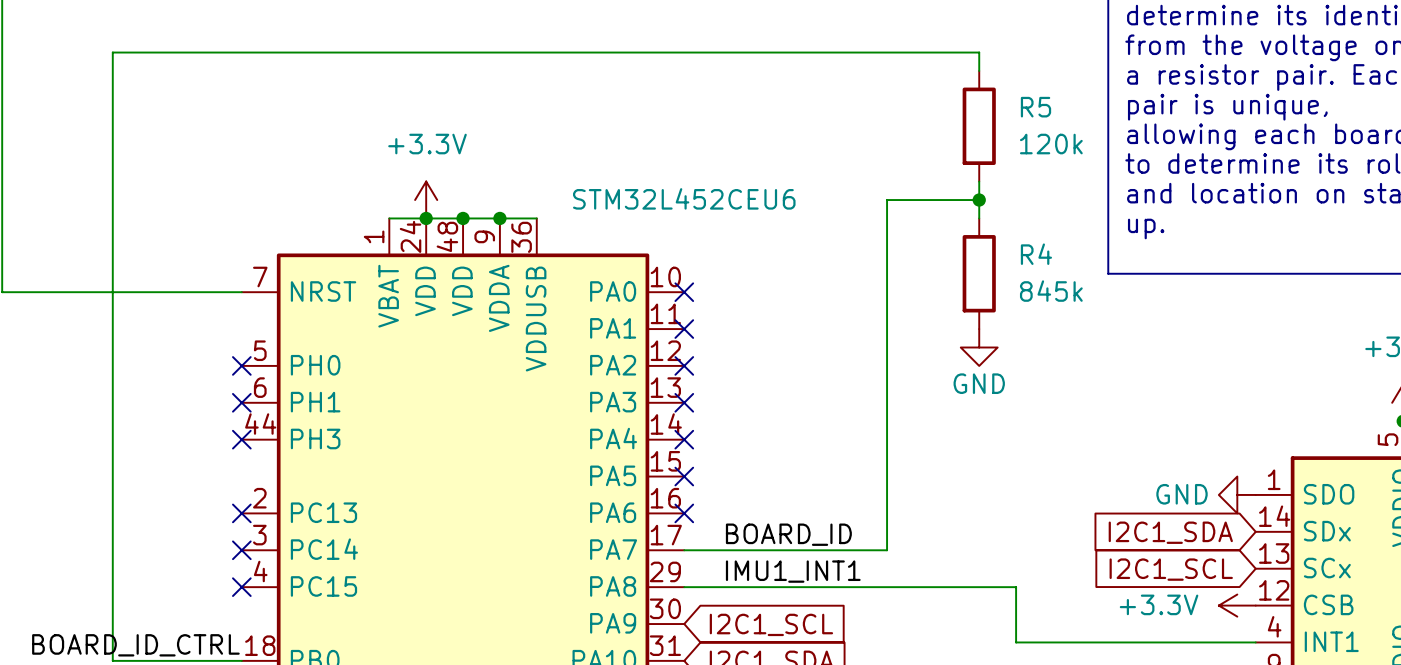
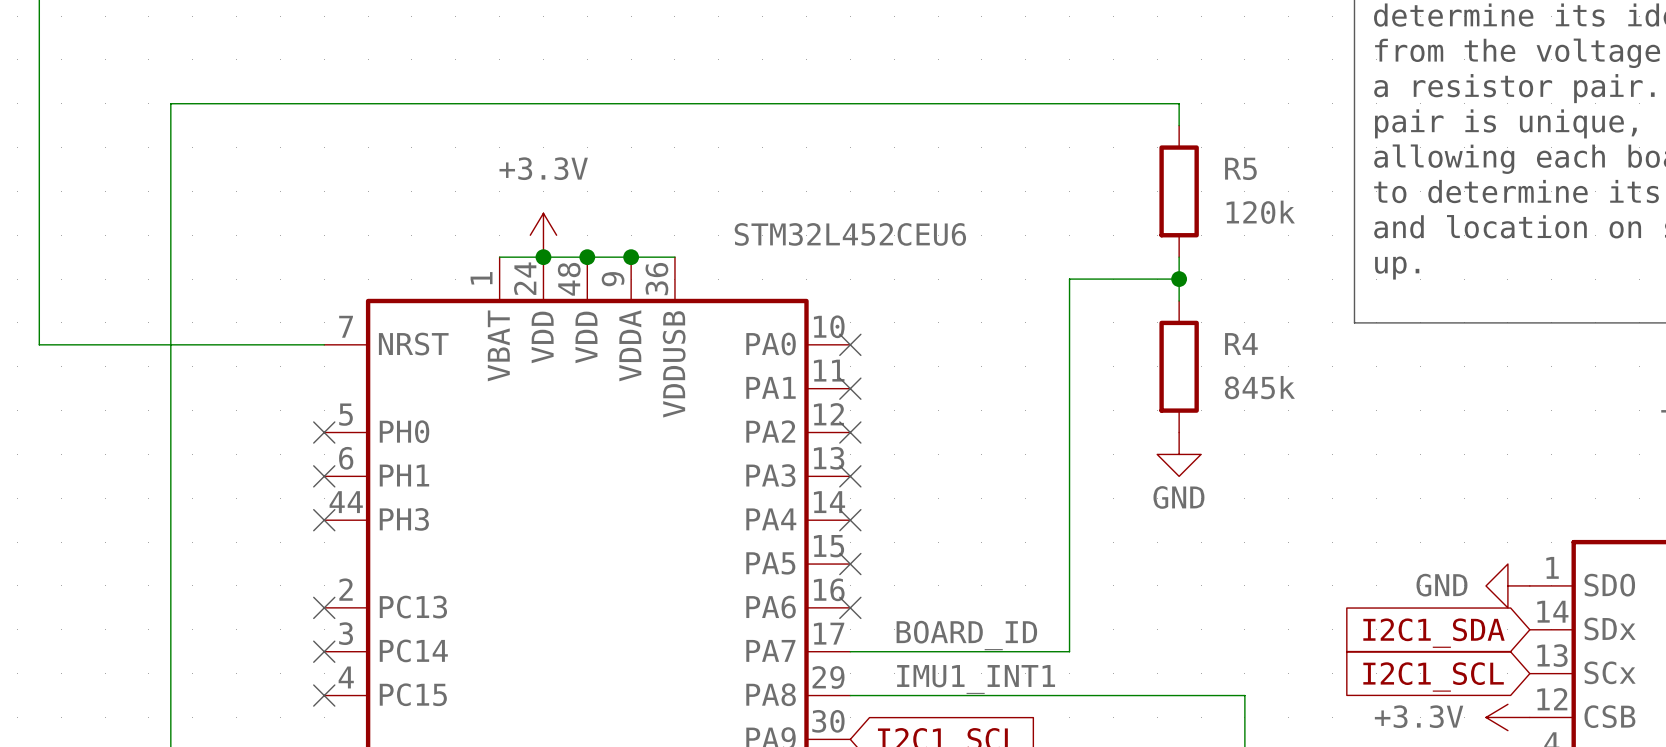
wire: (979, 70) (979, 52) (112, 52) (112, 89) -> (1179, 125) (1179, 103) (170, 103)
R5 position: (979, 126) -> (1179, 191)
wire: (979, 181) (979, 218) -> (1179, 257) (1179, 301)
wire: (979, 200) (887, 200) (887, 550) (868, 550) -> (1179, 279) (1069, 279) (1069, 651)
junction position: (979, 200) -> (1179, 279)
R4 position: (979, 273) -> (1179, 366)
power symbol position: GND (979, 347) -> GND (1179, 454)

